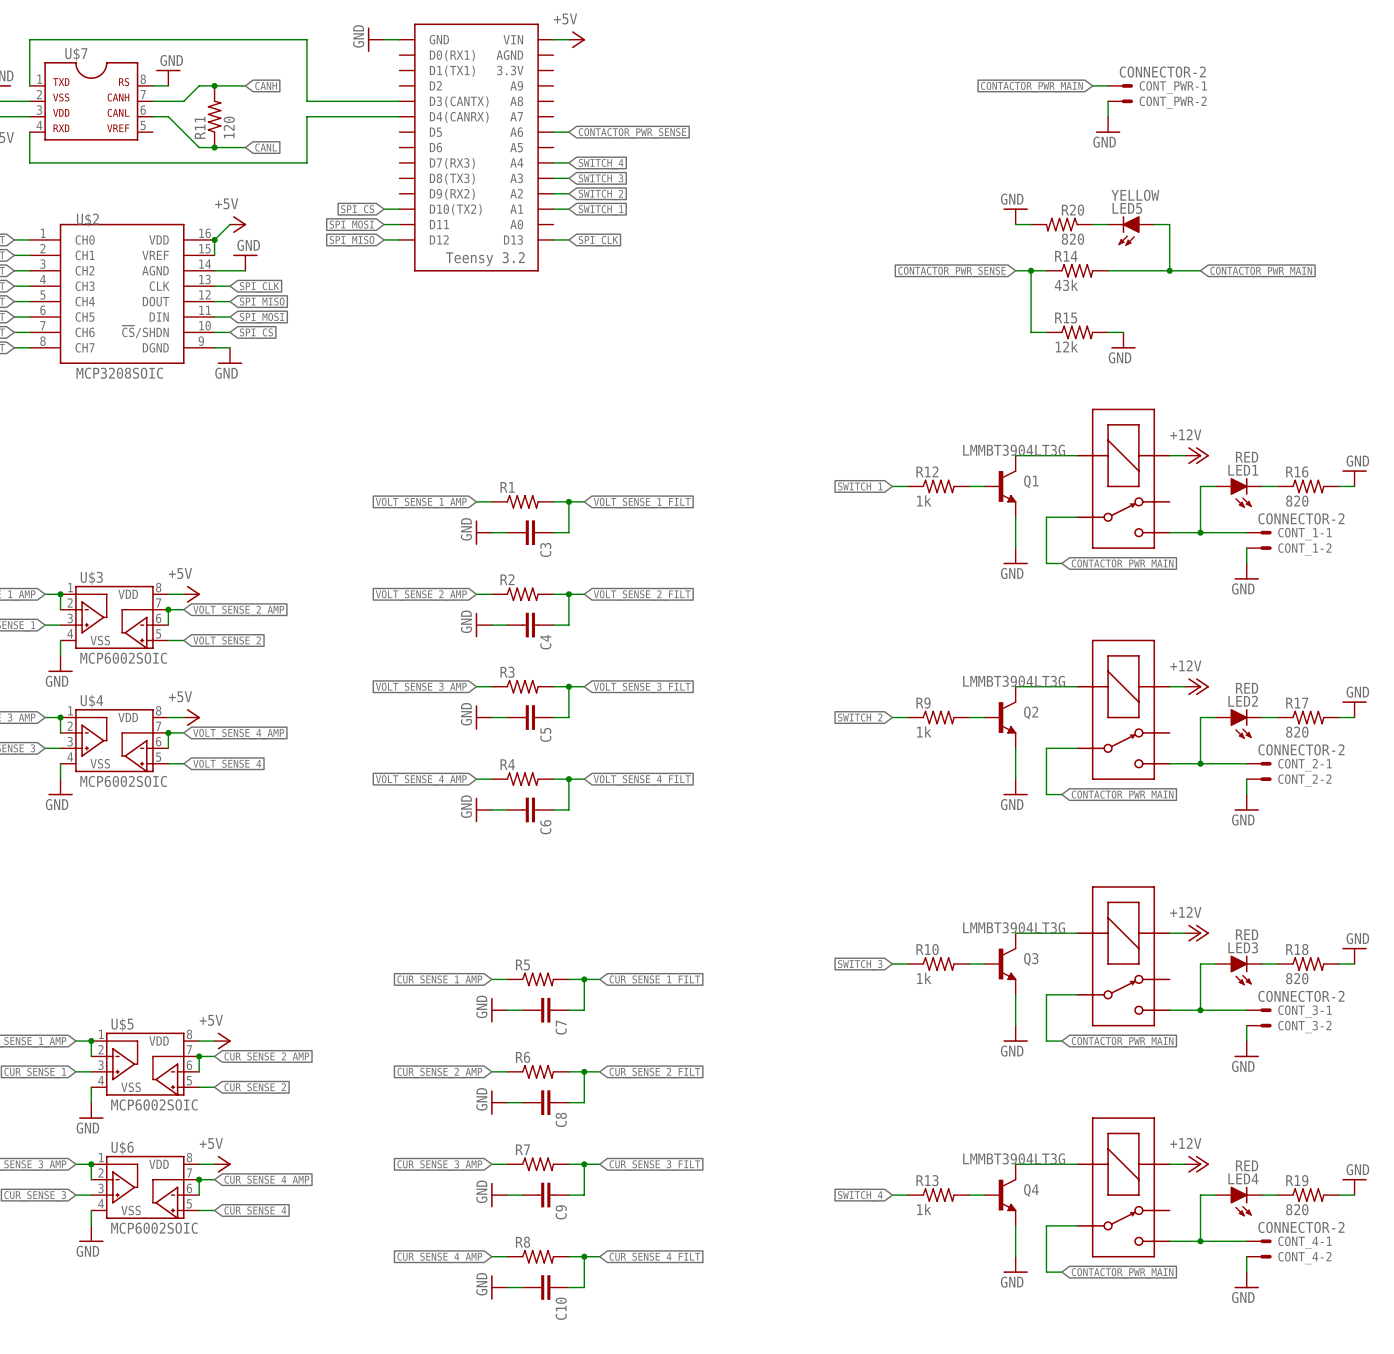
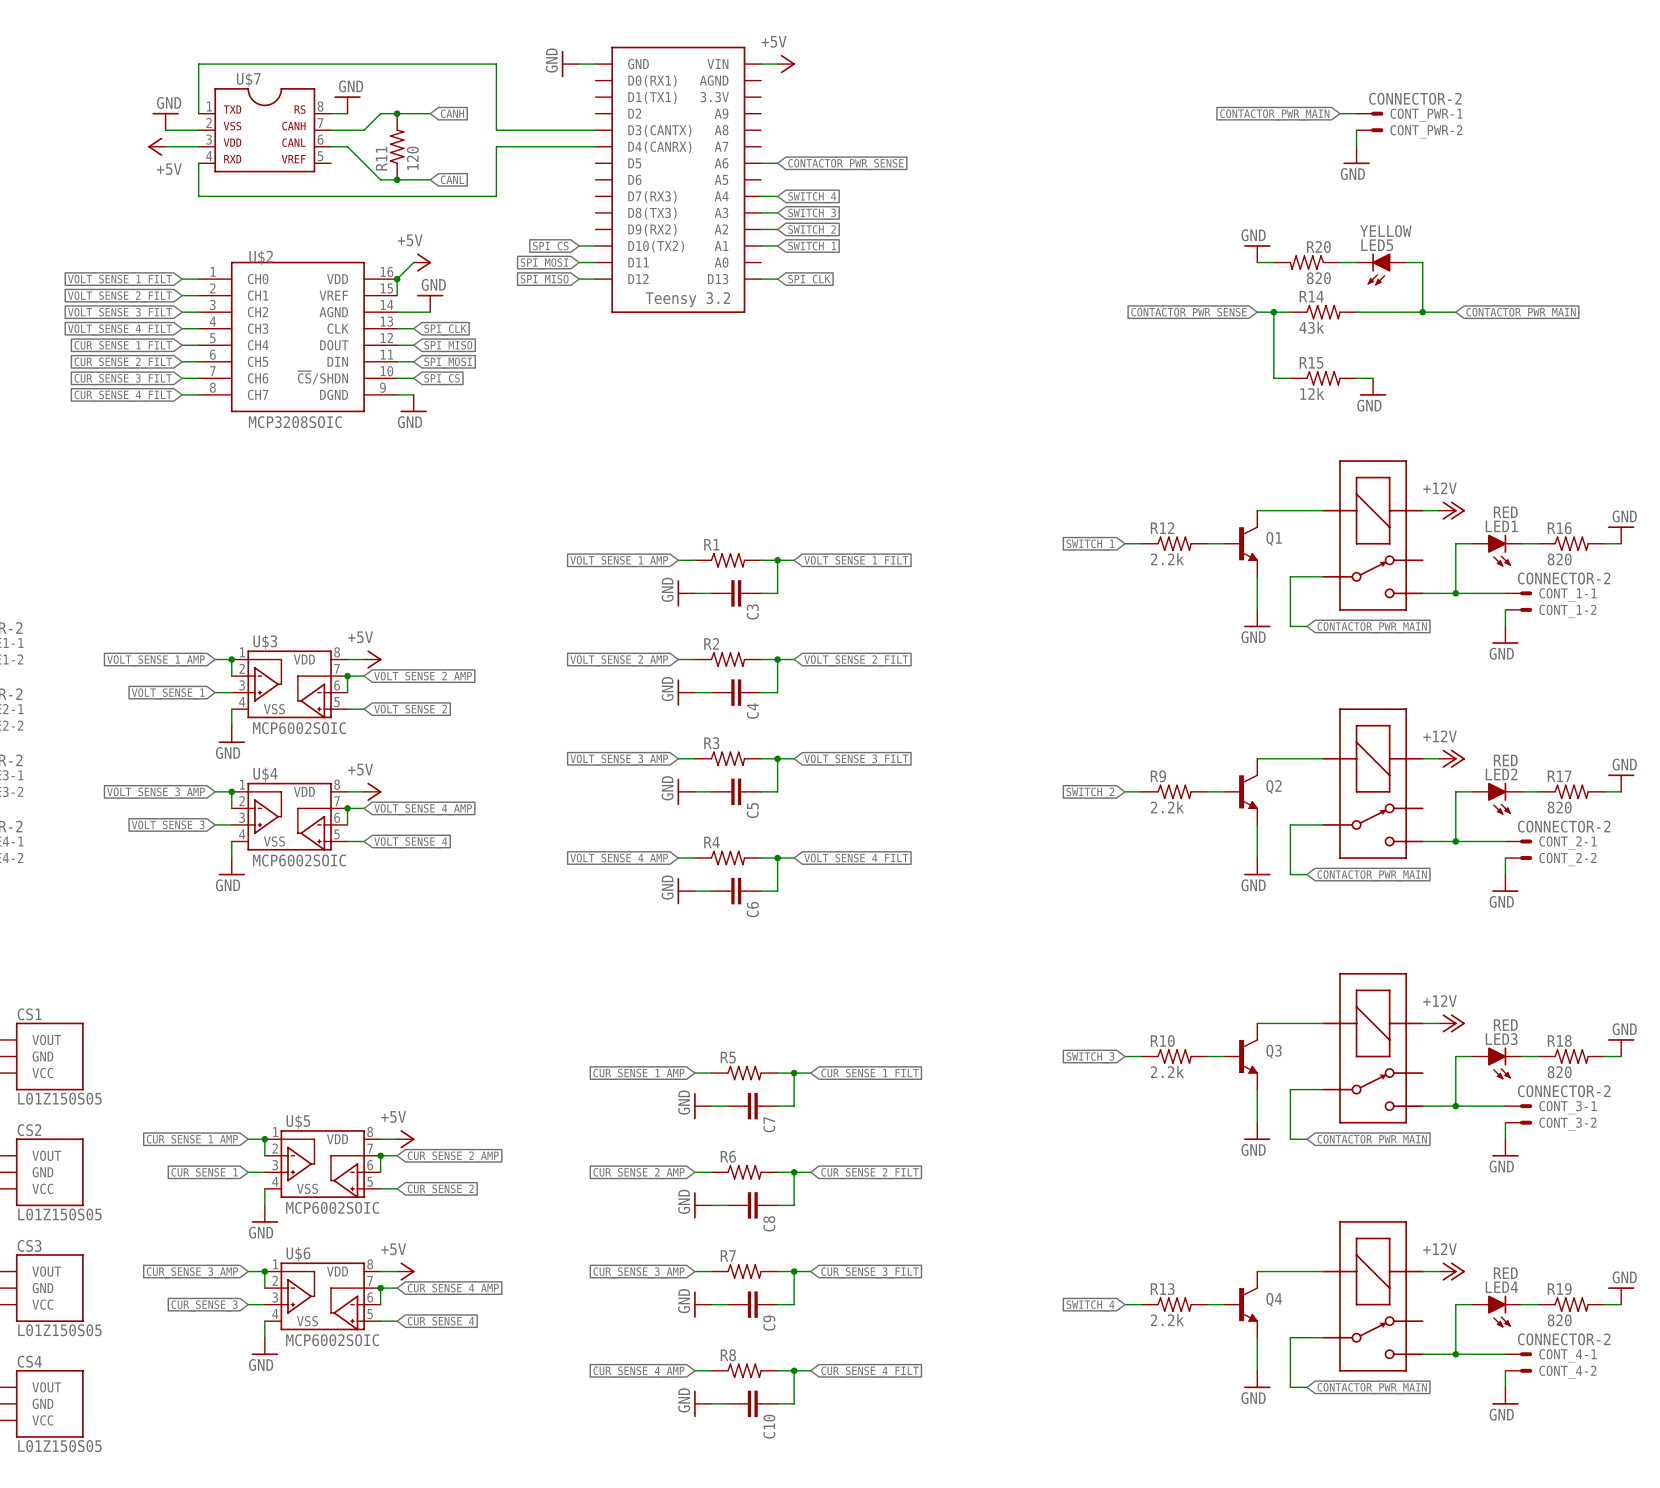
Q1 value: LMMBT3904LT3G (1014, 450) -> none
R12 value: 1k (924, 500) -> 2.2k (1167, 559)
Q2 value: LMMBT3904LT3G (1014, 681) -> none
R9 value: 1k (924, 731) -> 2.2k (1167, 807)
Q3 value: LMMBT3904LT3G (1014, 927) -> none
R10 value: 1k (924, 978) -> 2.2k (1167, 1071)
Q4 value: LMMBT3904LT3G (1014, 1158) -> none
R13 value: 1k (924, 1209) -> 2.2k (1167, 1320)

